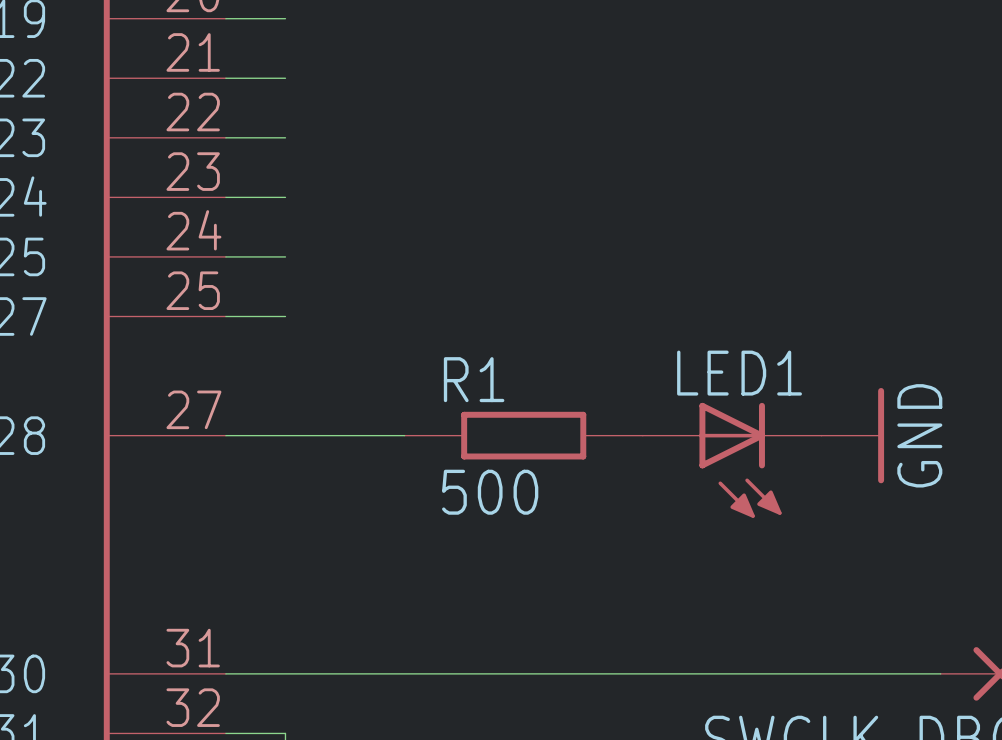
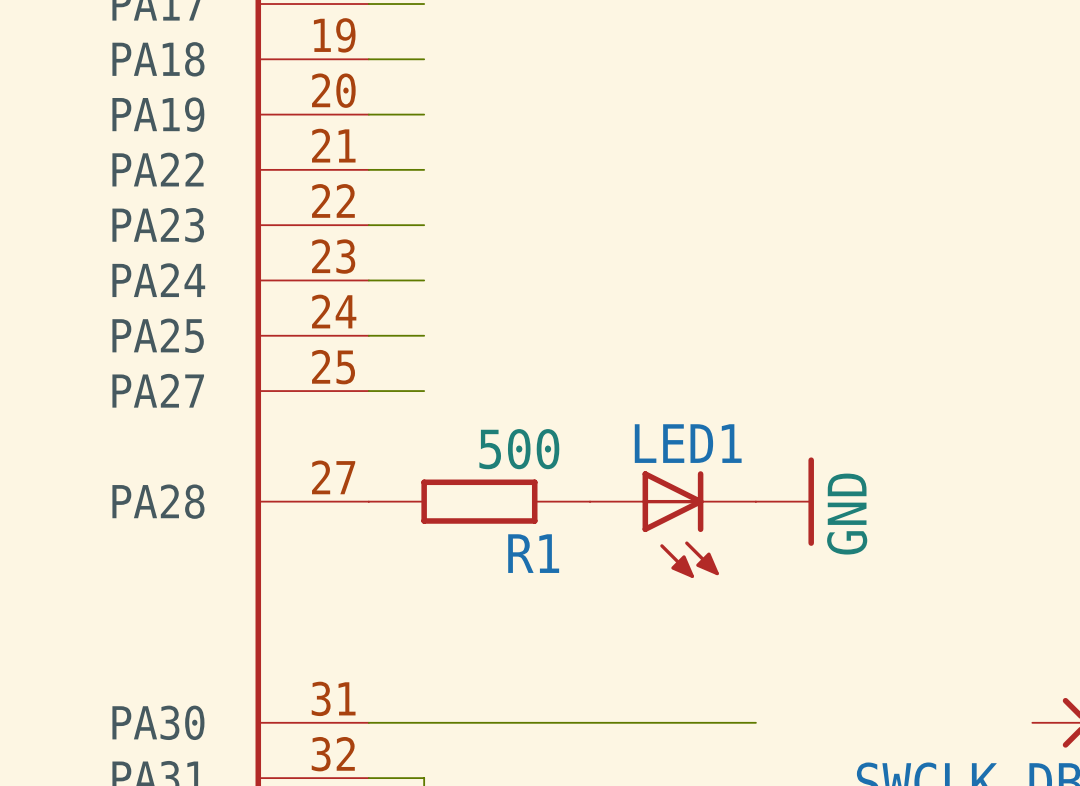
R1 name position: R1 (474, 379) -> R1 (533, 553)
wire: (225, 435) (404, 435) -> none
R1 position: (523, 435) -> (479, 501)
power symbol position: GND (852, 435) -> GND (784, 501)
LED1 position: (732, 460) -> (672, 524)
R1 value position: 500 (490, 492) -> 500 (519, 449)
wire: (642, 673) (940, 673) -> none

